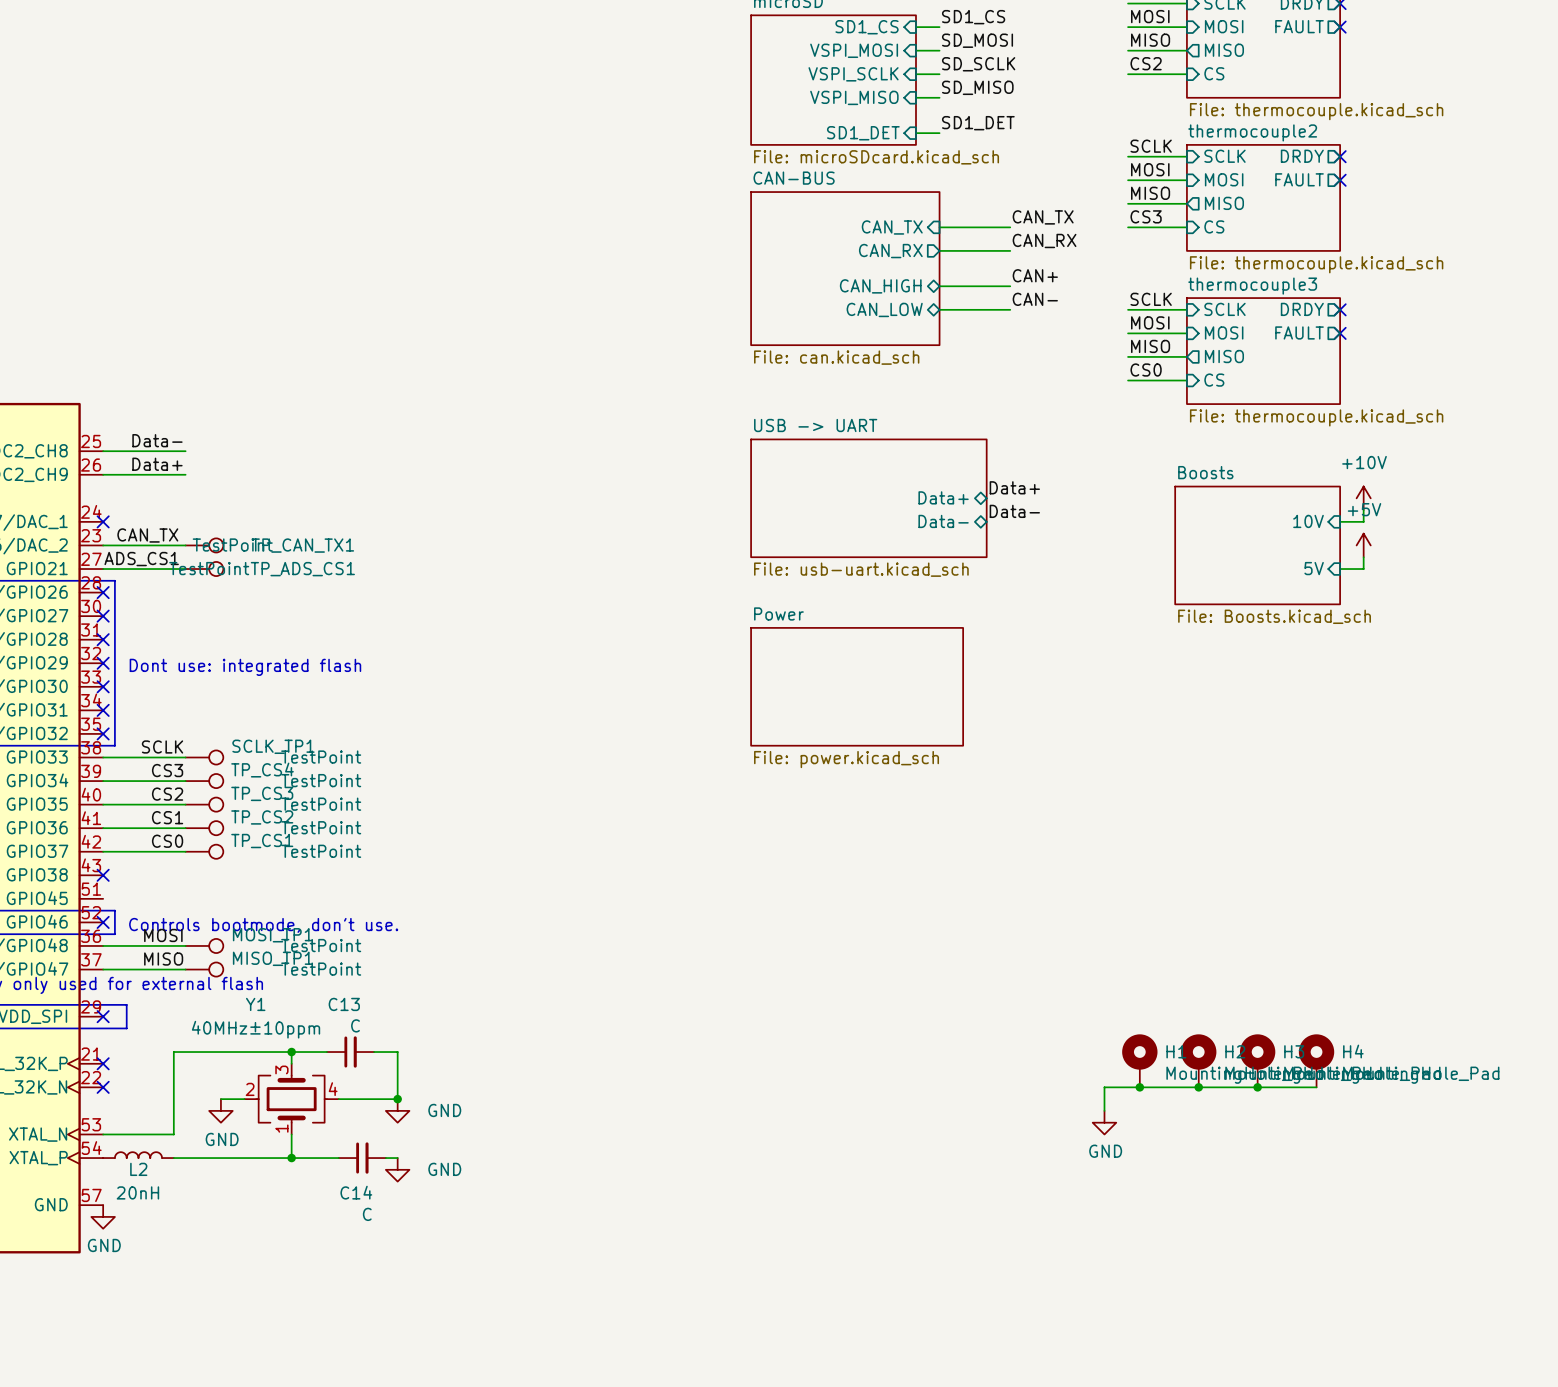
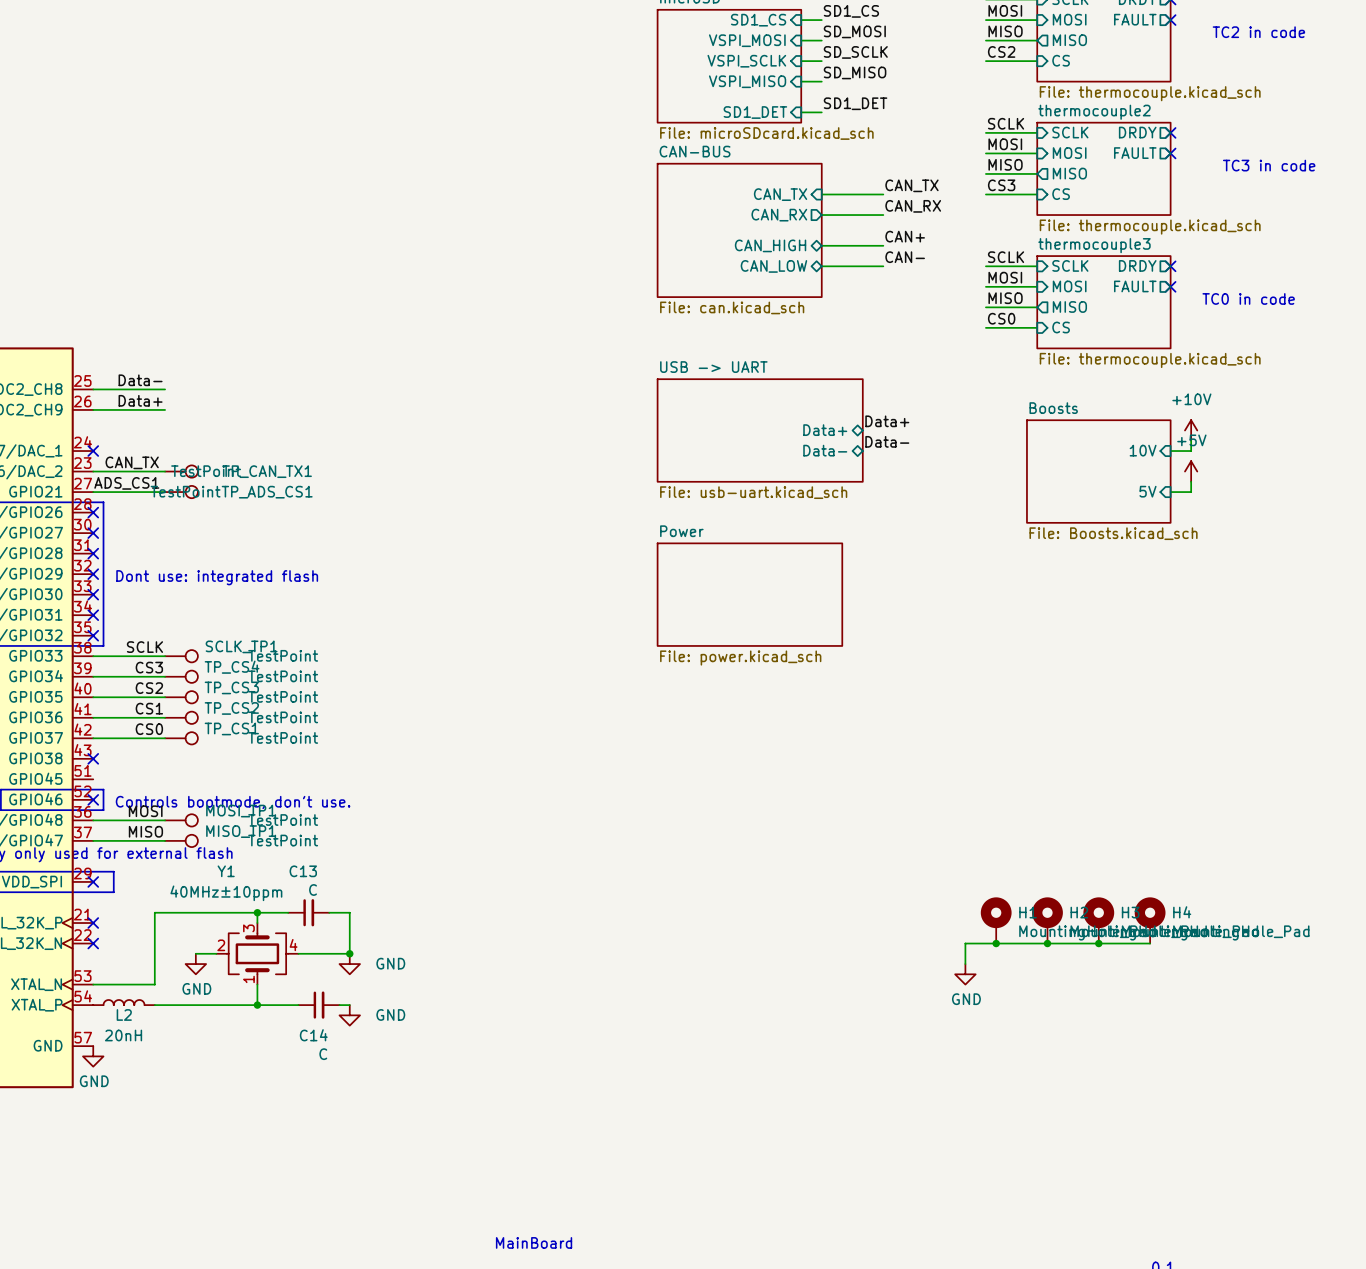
text: none -> TC2 in code (1258, 32)
text: none -> TC3 in code (1269, 165)
text: none -> TC0 in code (1248, 298)

